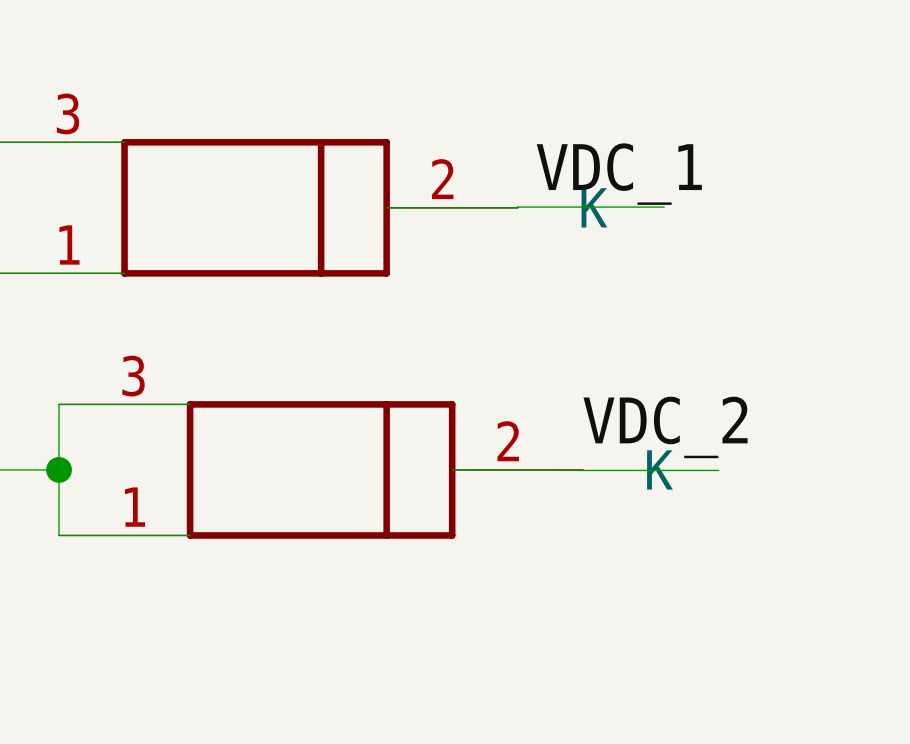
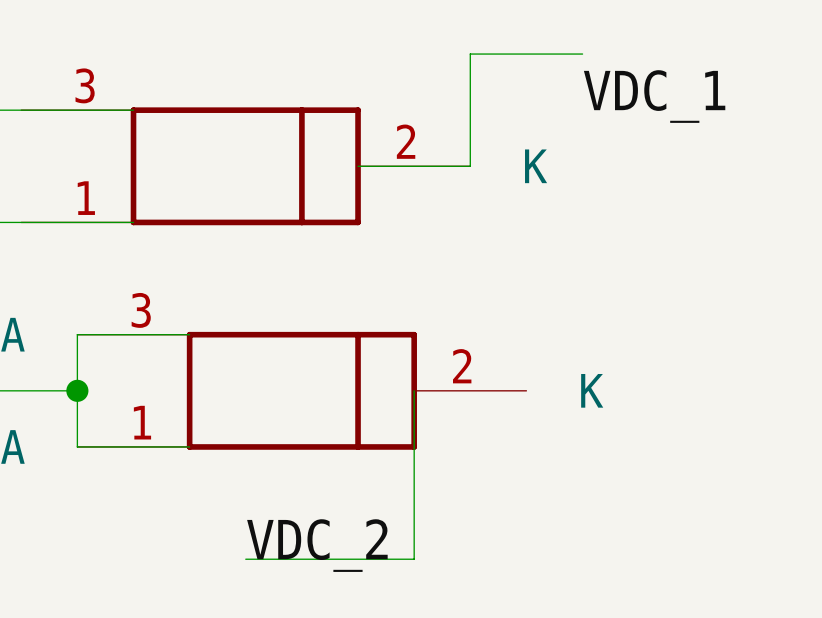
label position: VDC_1 (619, 174) -> VDC_1 (654, 96)
wire: (517, 207) (664, 207) -> (470, 165) (470, 54) (582, 54)
label position: VDC_2 (665, 427) -> VDC_2 (317, 545)
wire: (452, 469) (718, 470) -> (414, 390) (414, 559) (245, 559)

